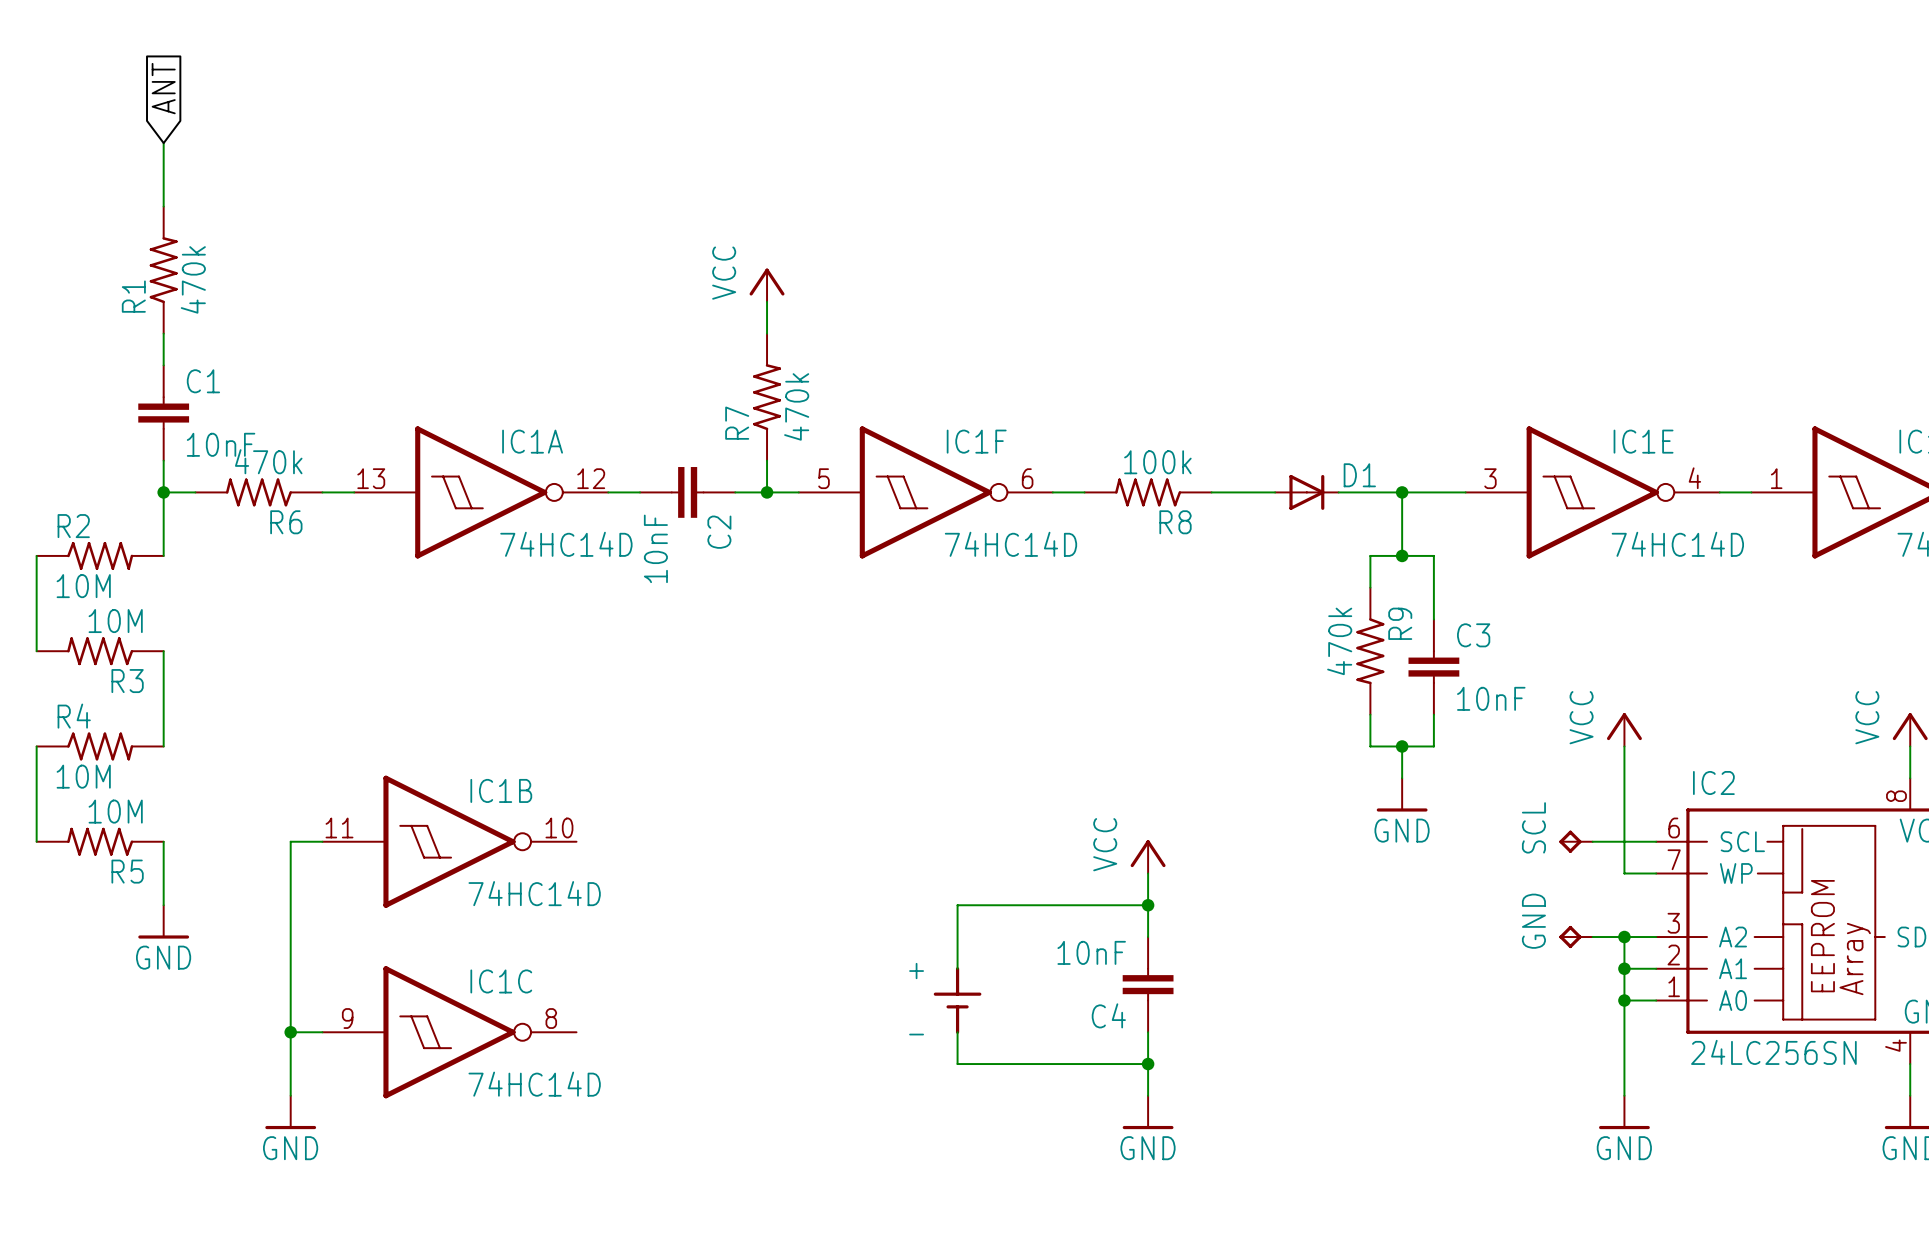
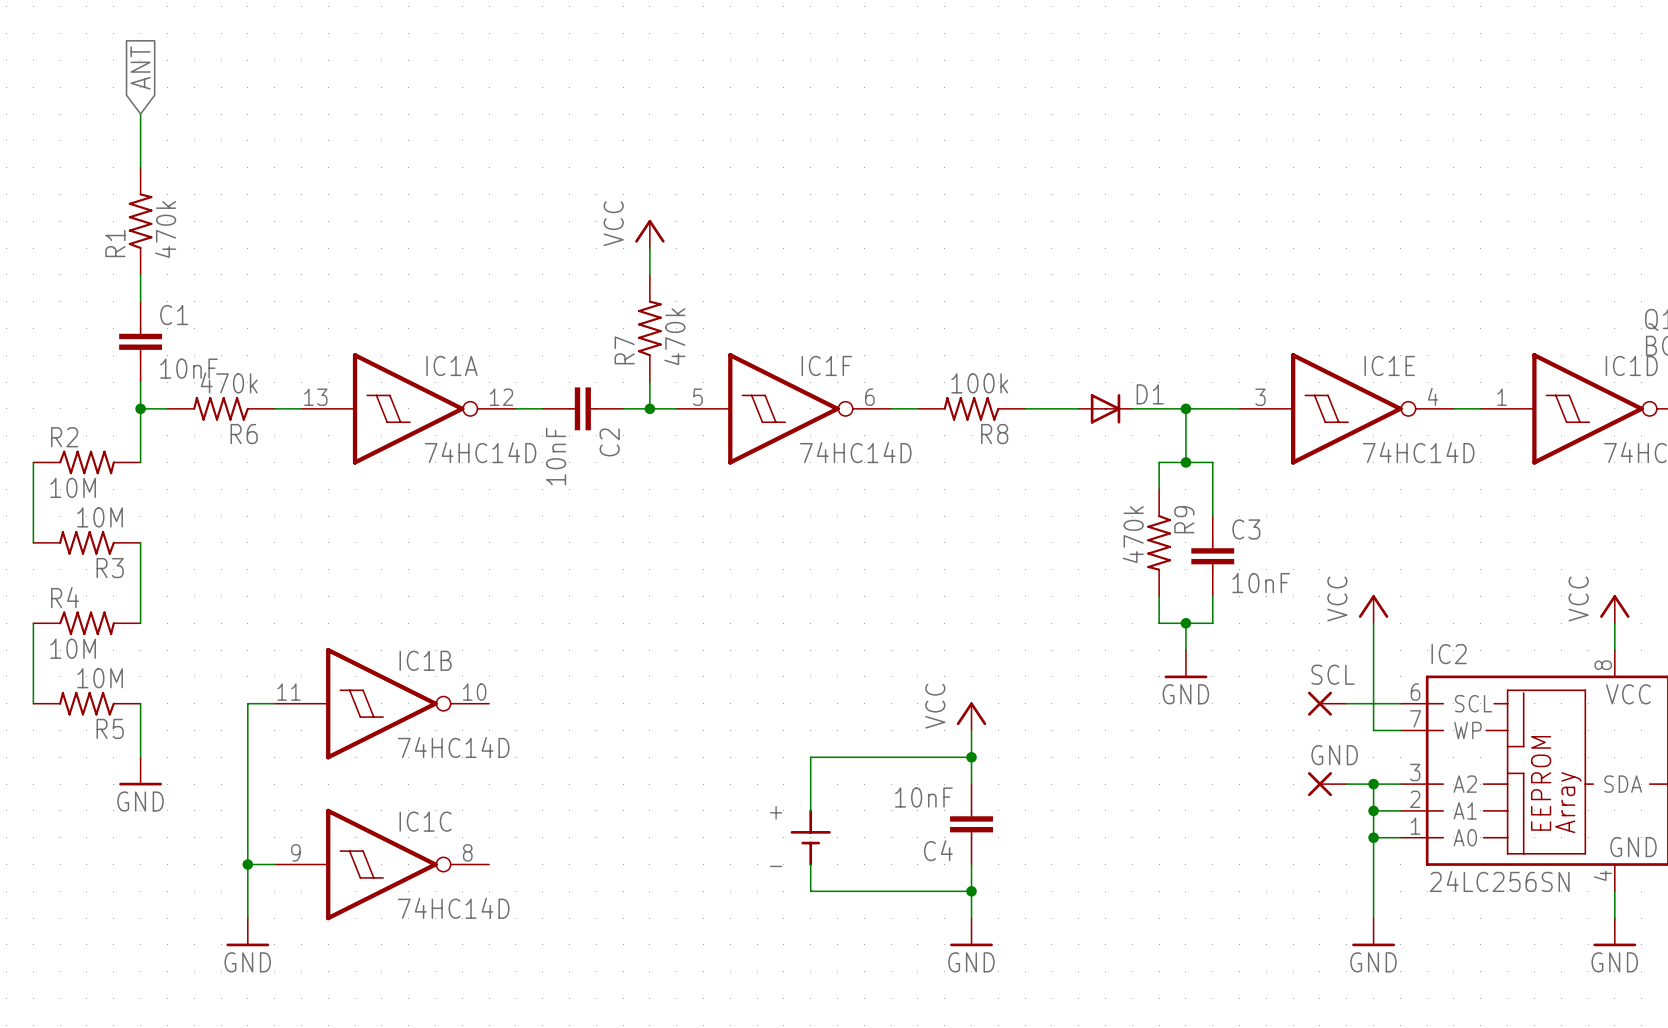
SCL name position: SCL (1533, 827) -> SCL (1333, 674)
SCL symbol: [1559, 830, 1593, 853] -> [1307, 691, 1347, 716]
GND name position: GND (1533, 921) -> GND (1334, 755)
GND symbol: [1559, 925, 1593, 949] -> [1307, 772, 1347, 797]

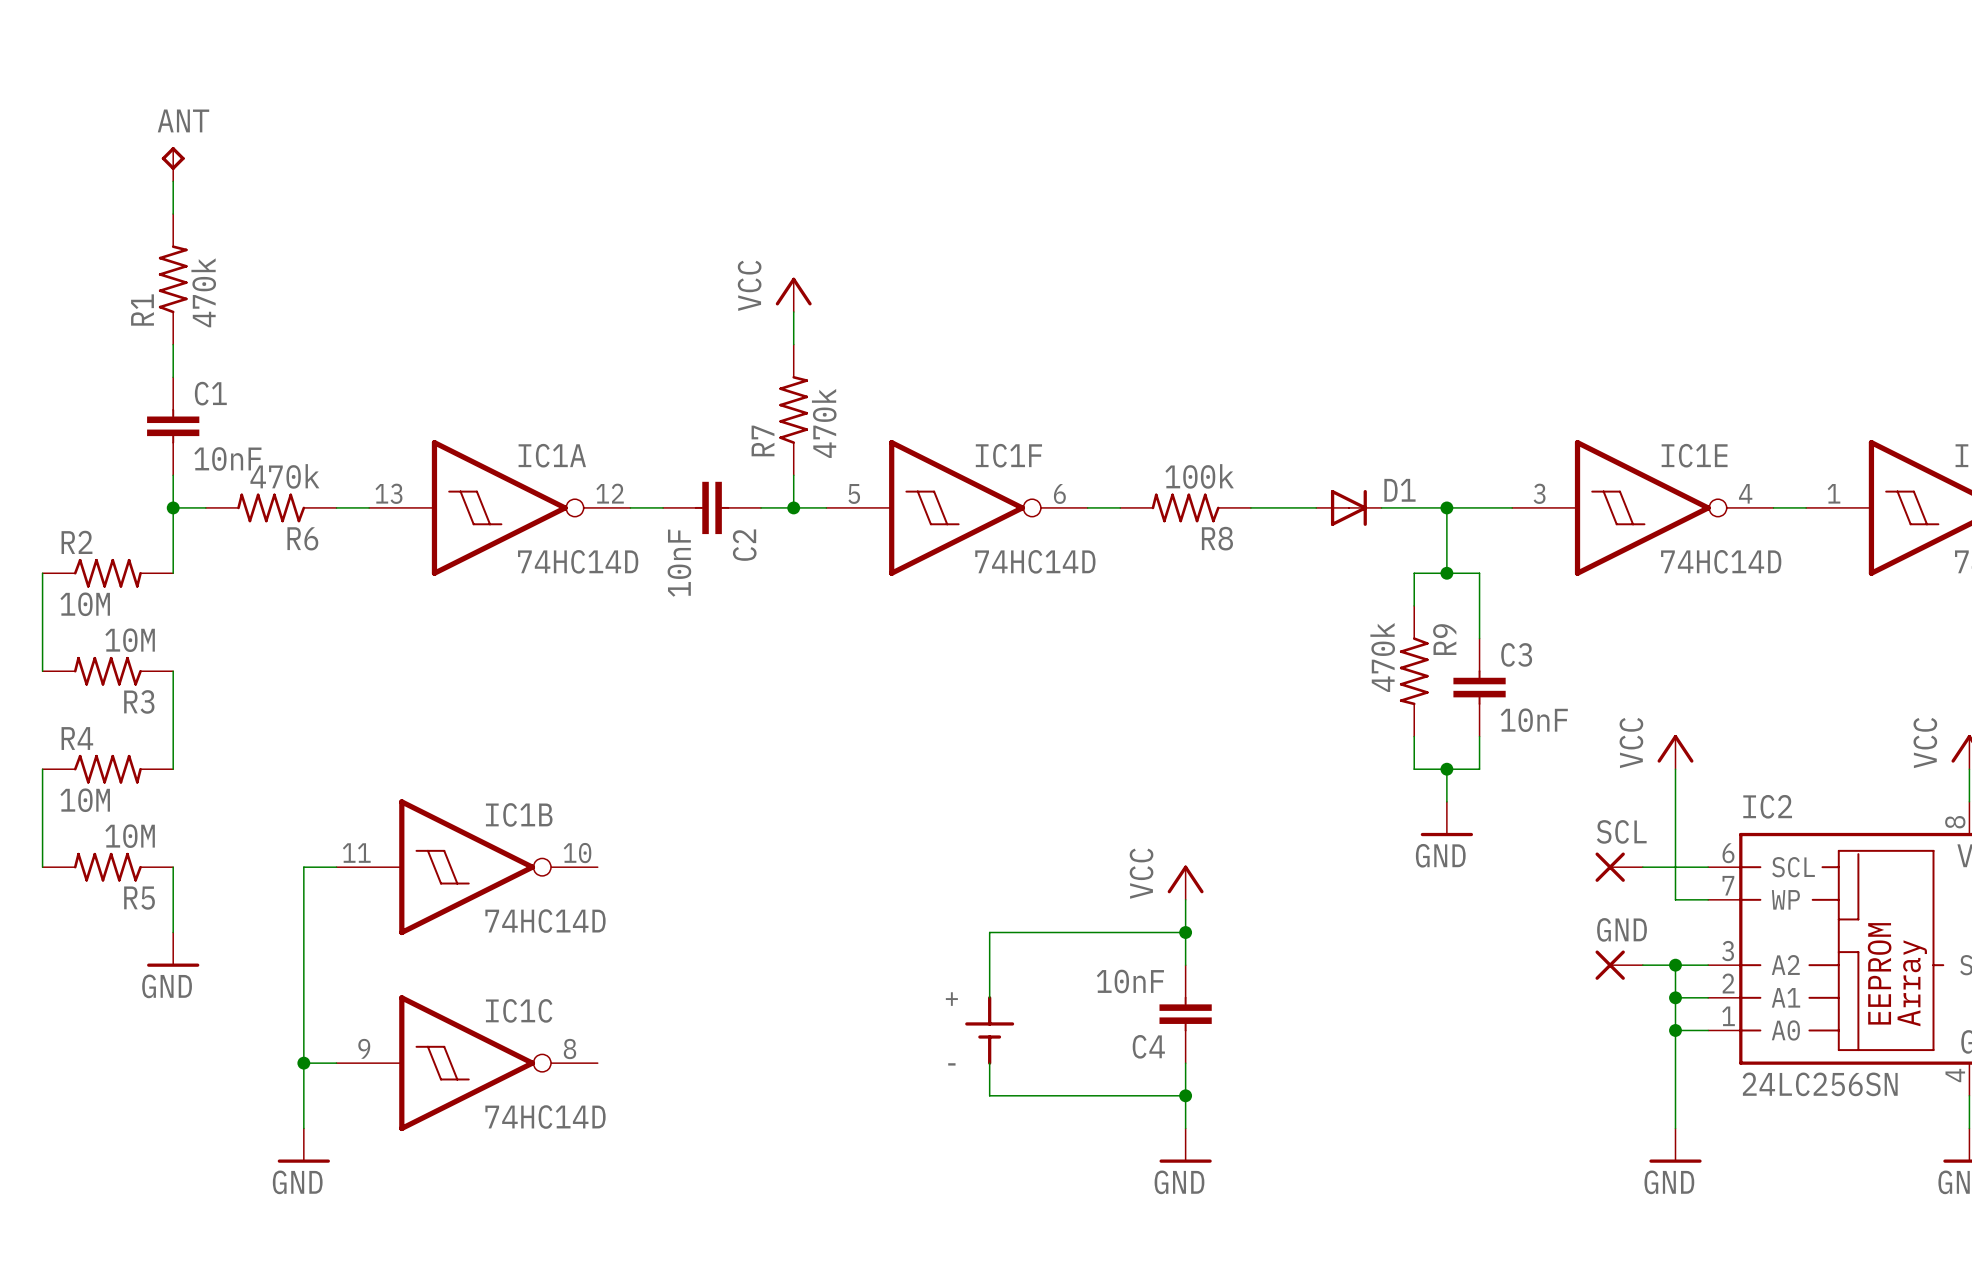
global label: ANT (140, 67) -> none
ANT: none -> (173, 164)

